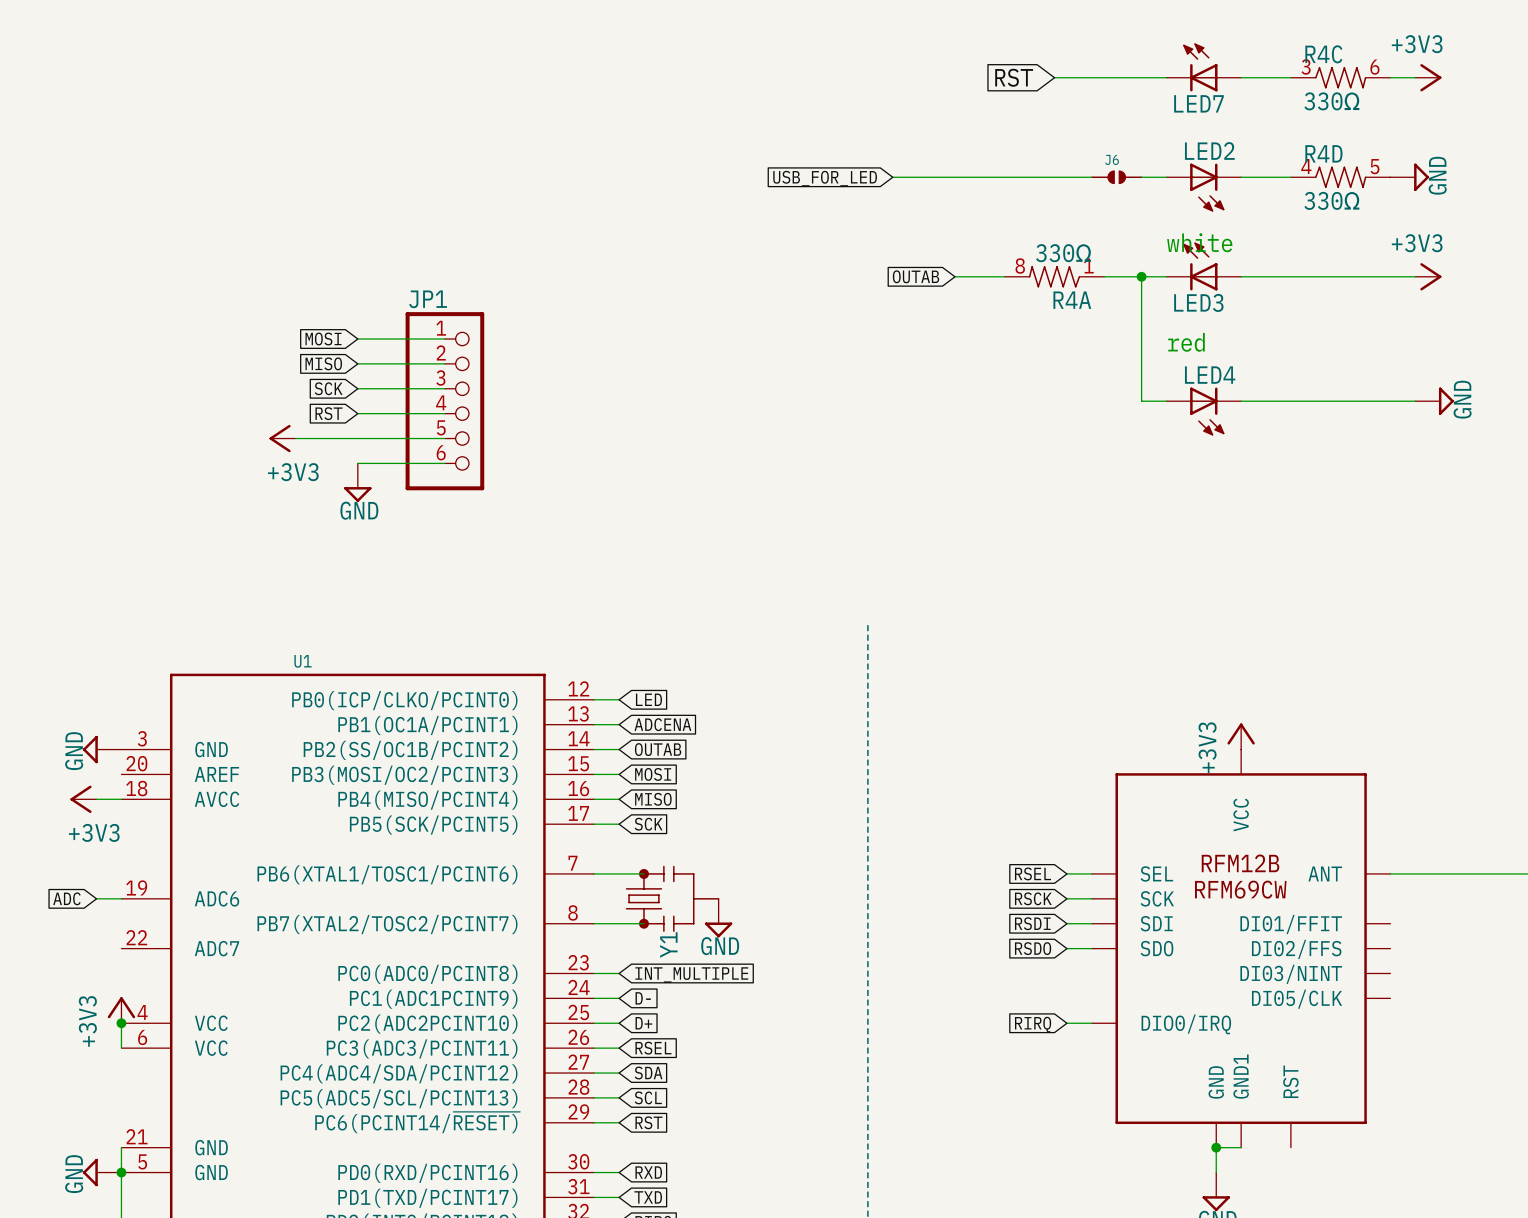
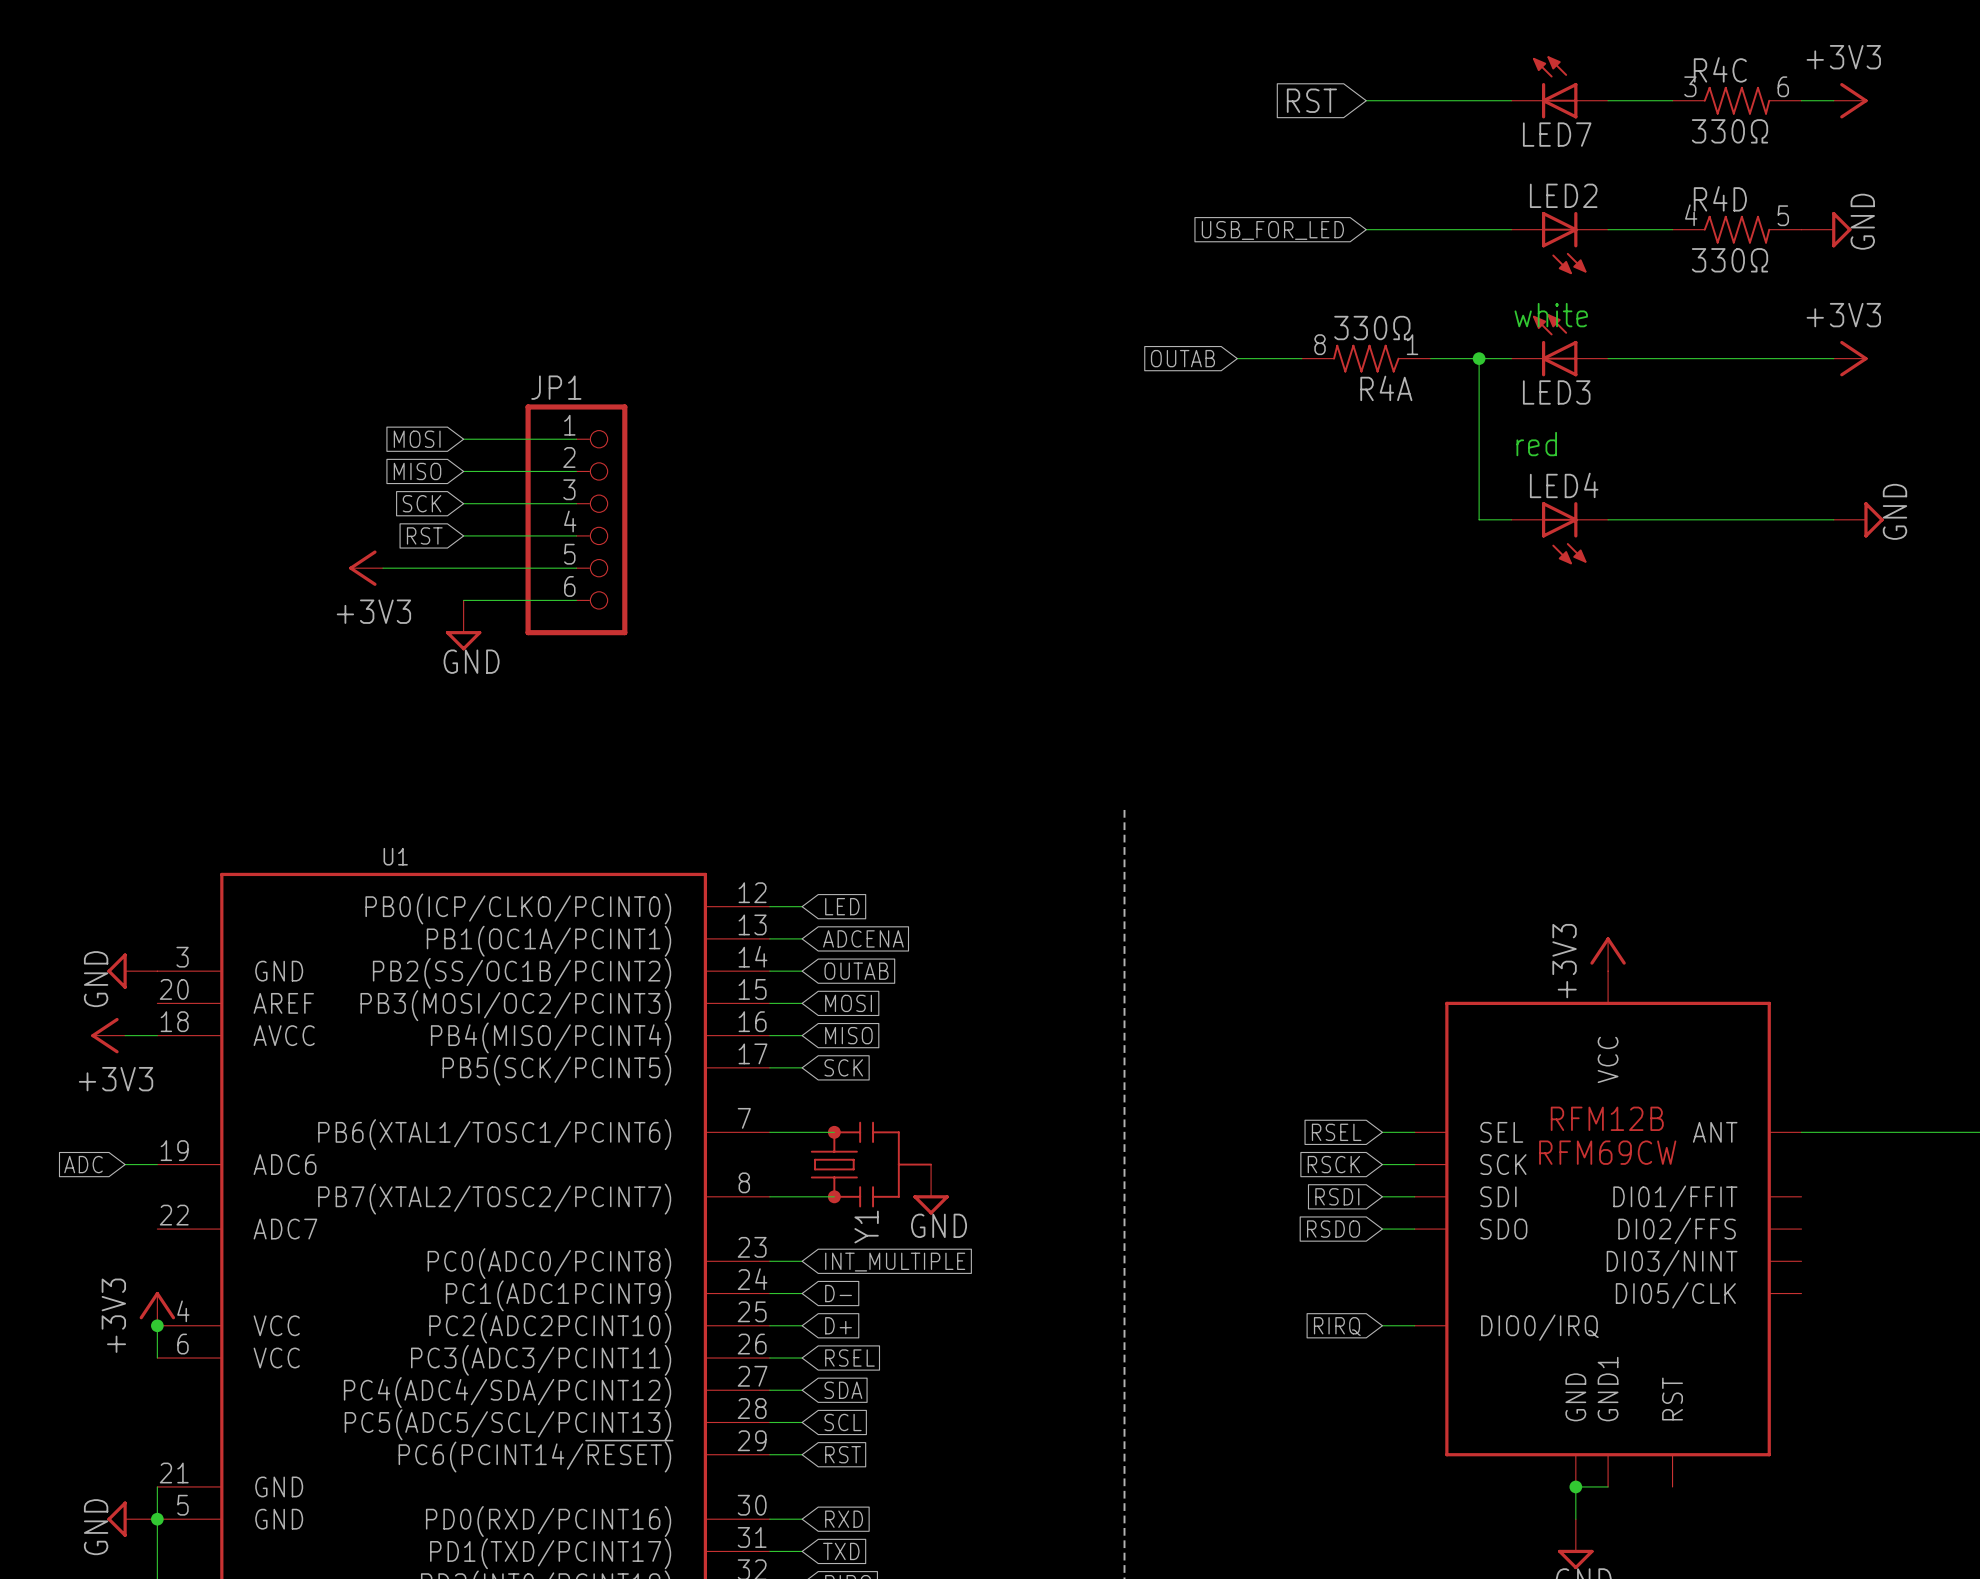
wire: (892, 177) (1054, 177) -> none
J6: (1116, 177) -> none
global label position: USB_FOR_LED (825, 178) -> USB_FOR_LED (1272, 230)

